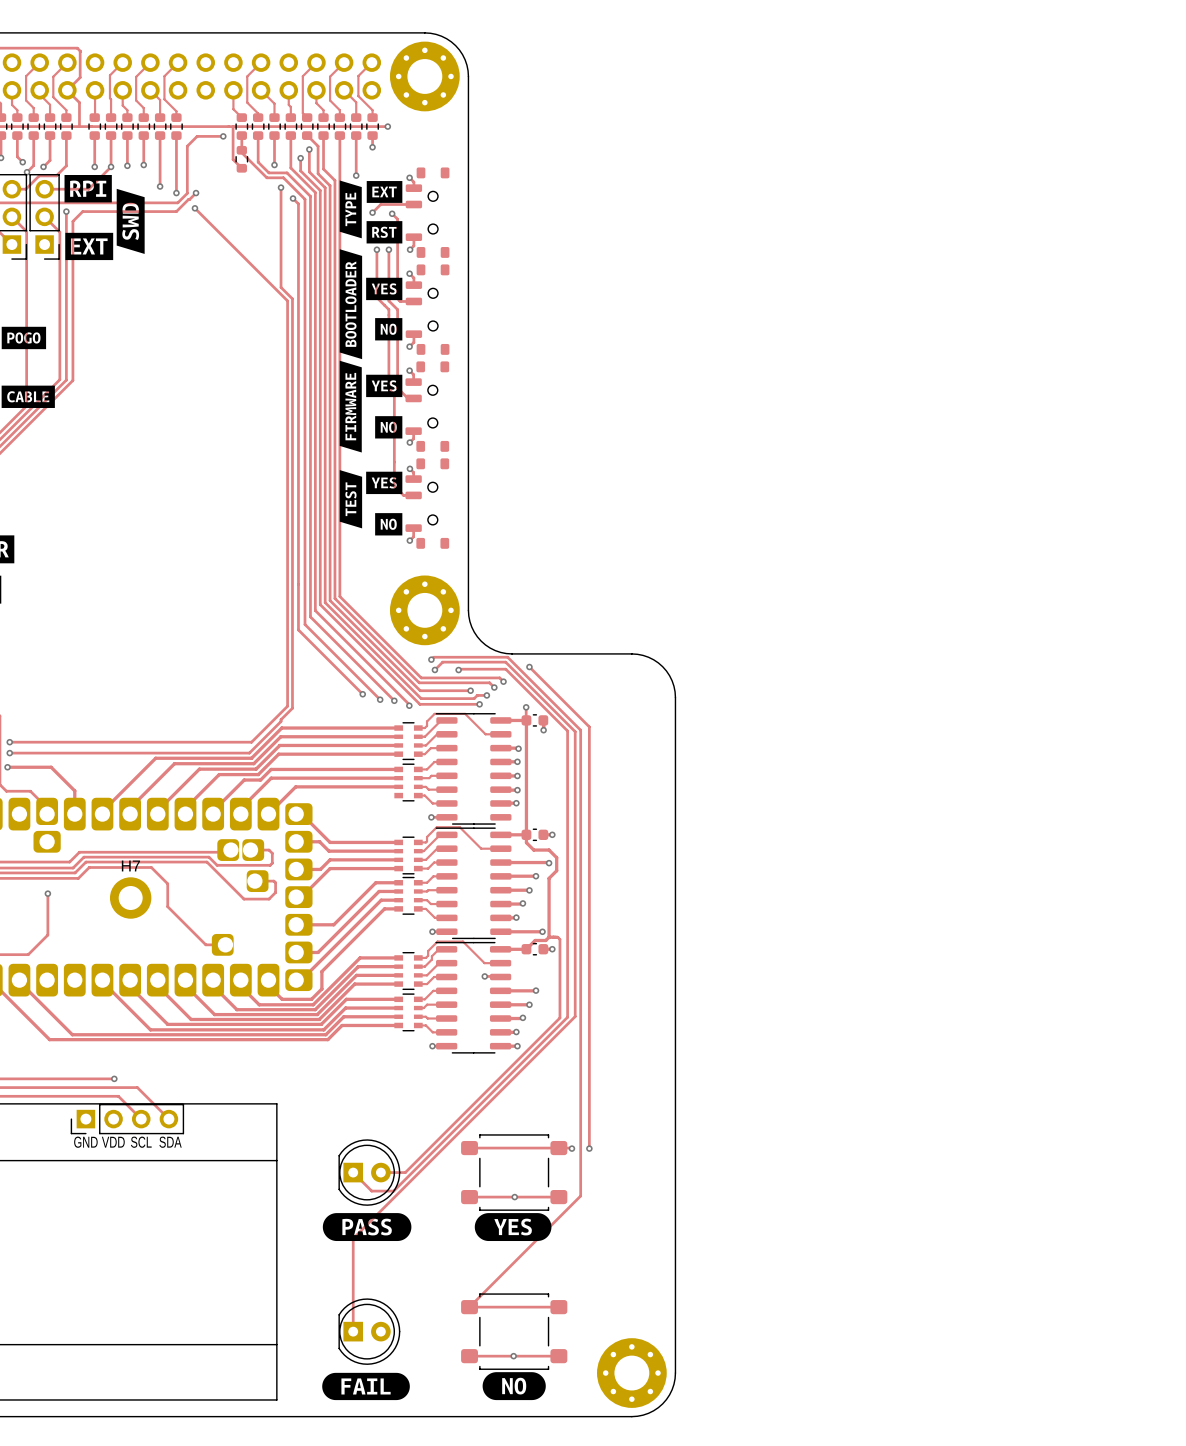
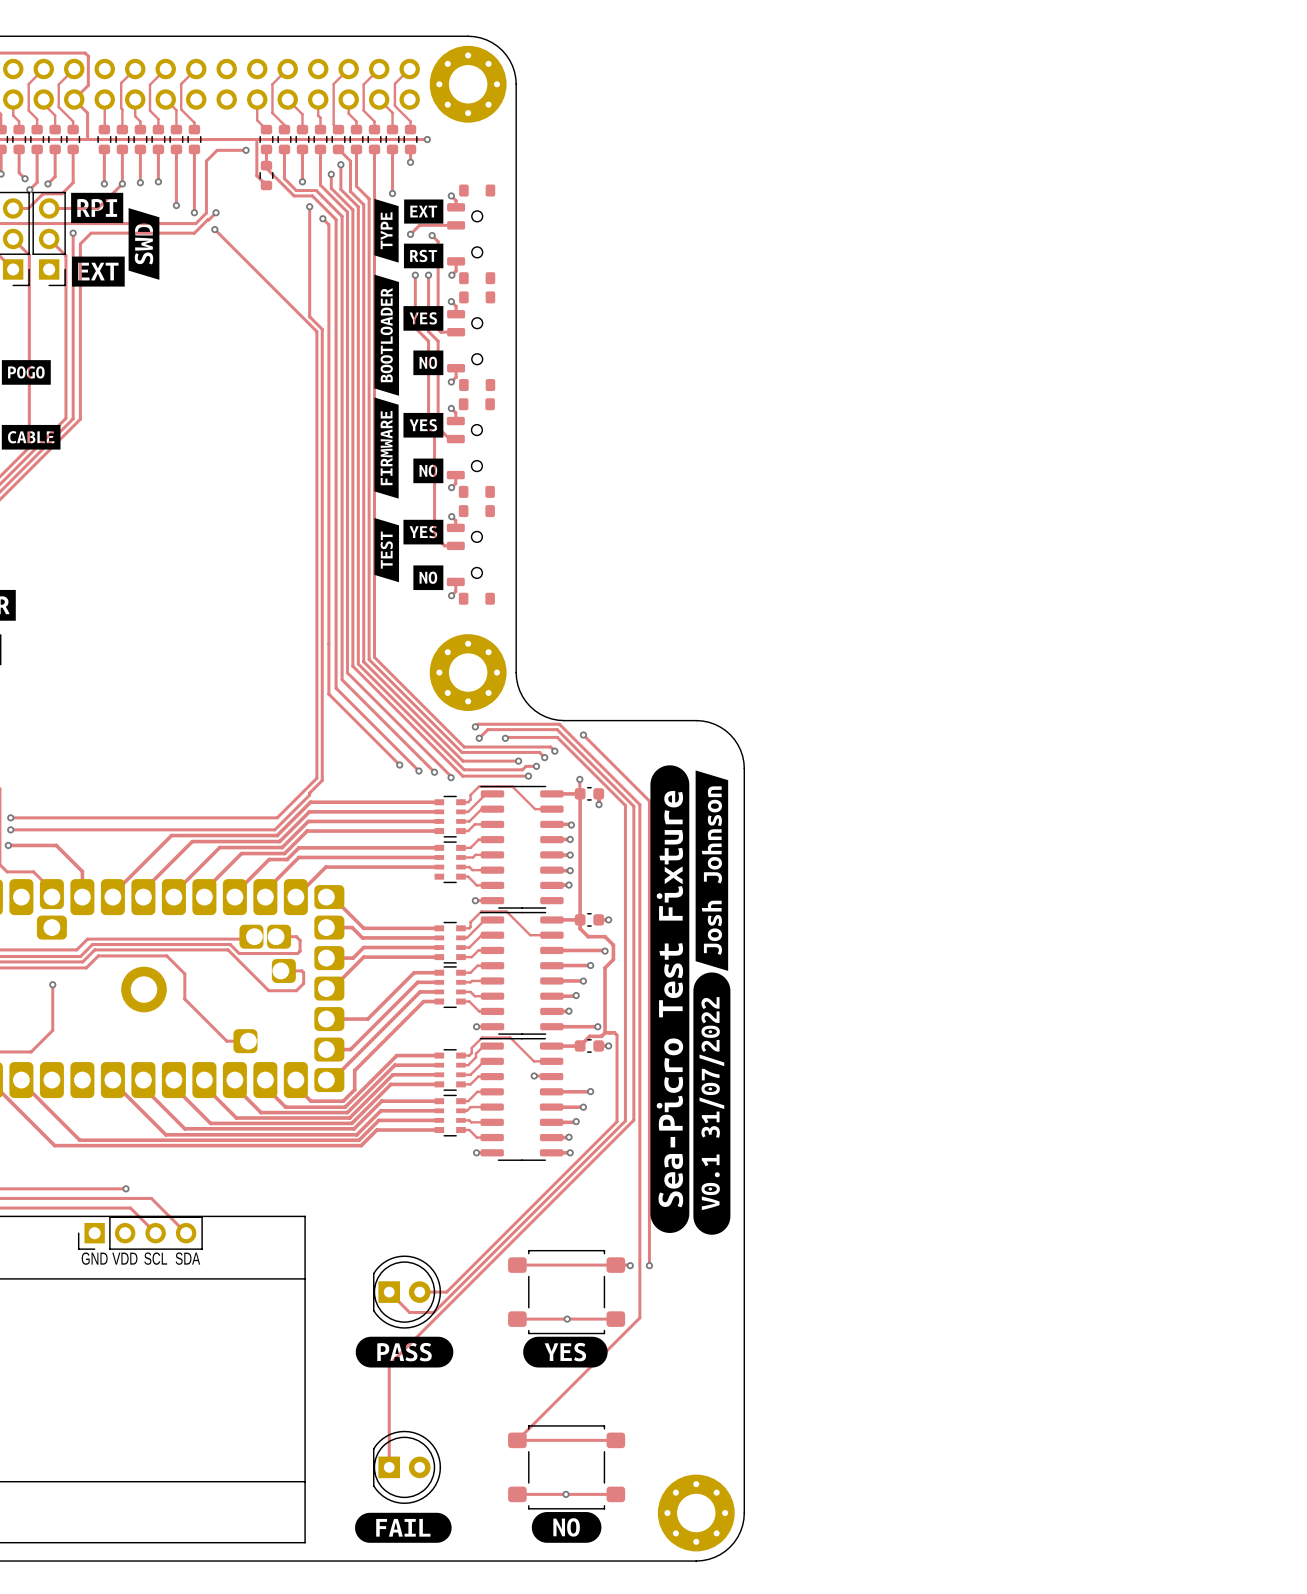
drawing: none -> [650, 765, 731, 1235]
H7 name: H7 (130, 866) -> none

